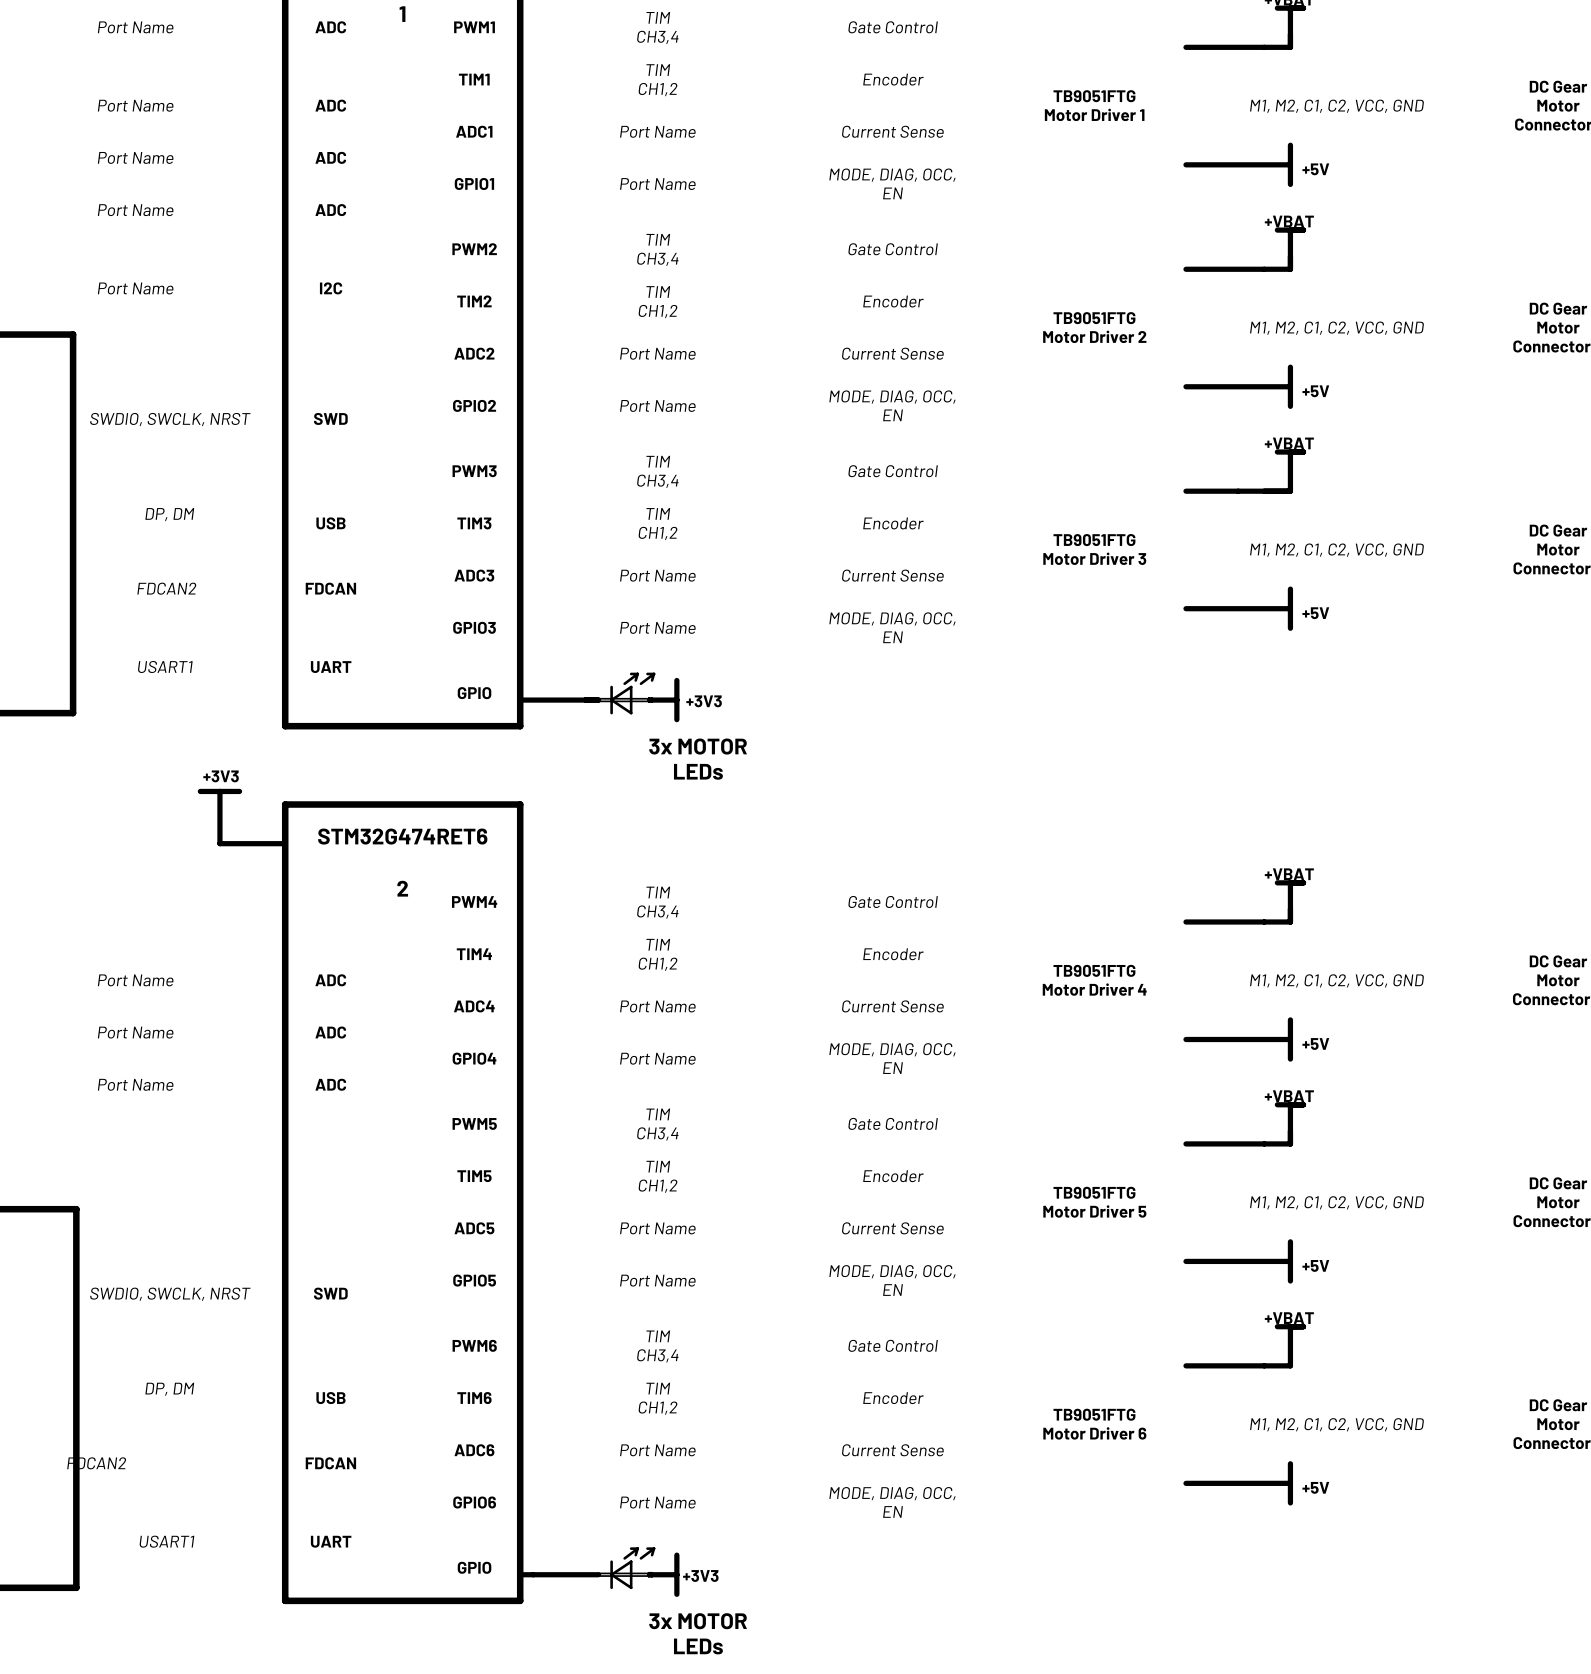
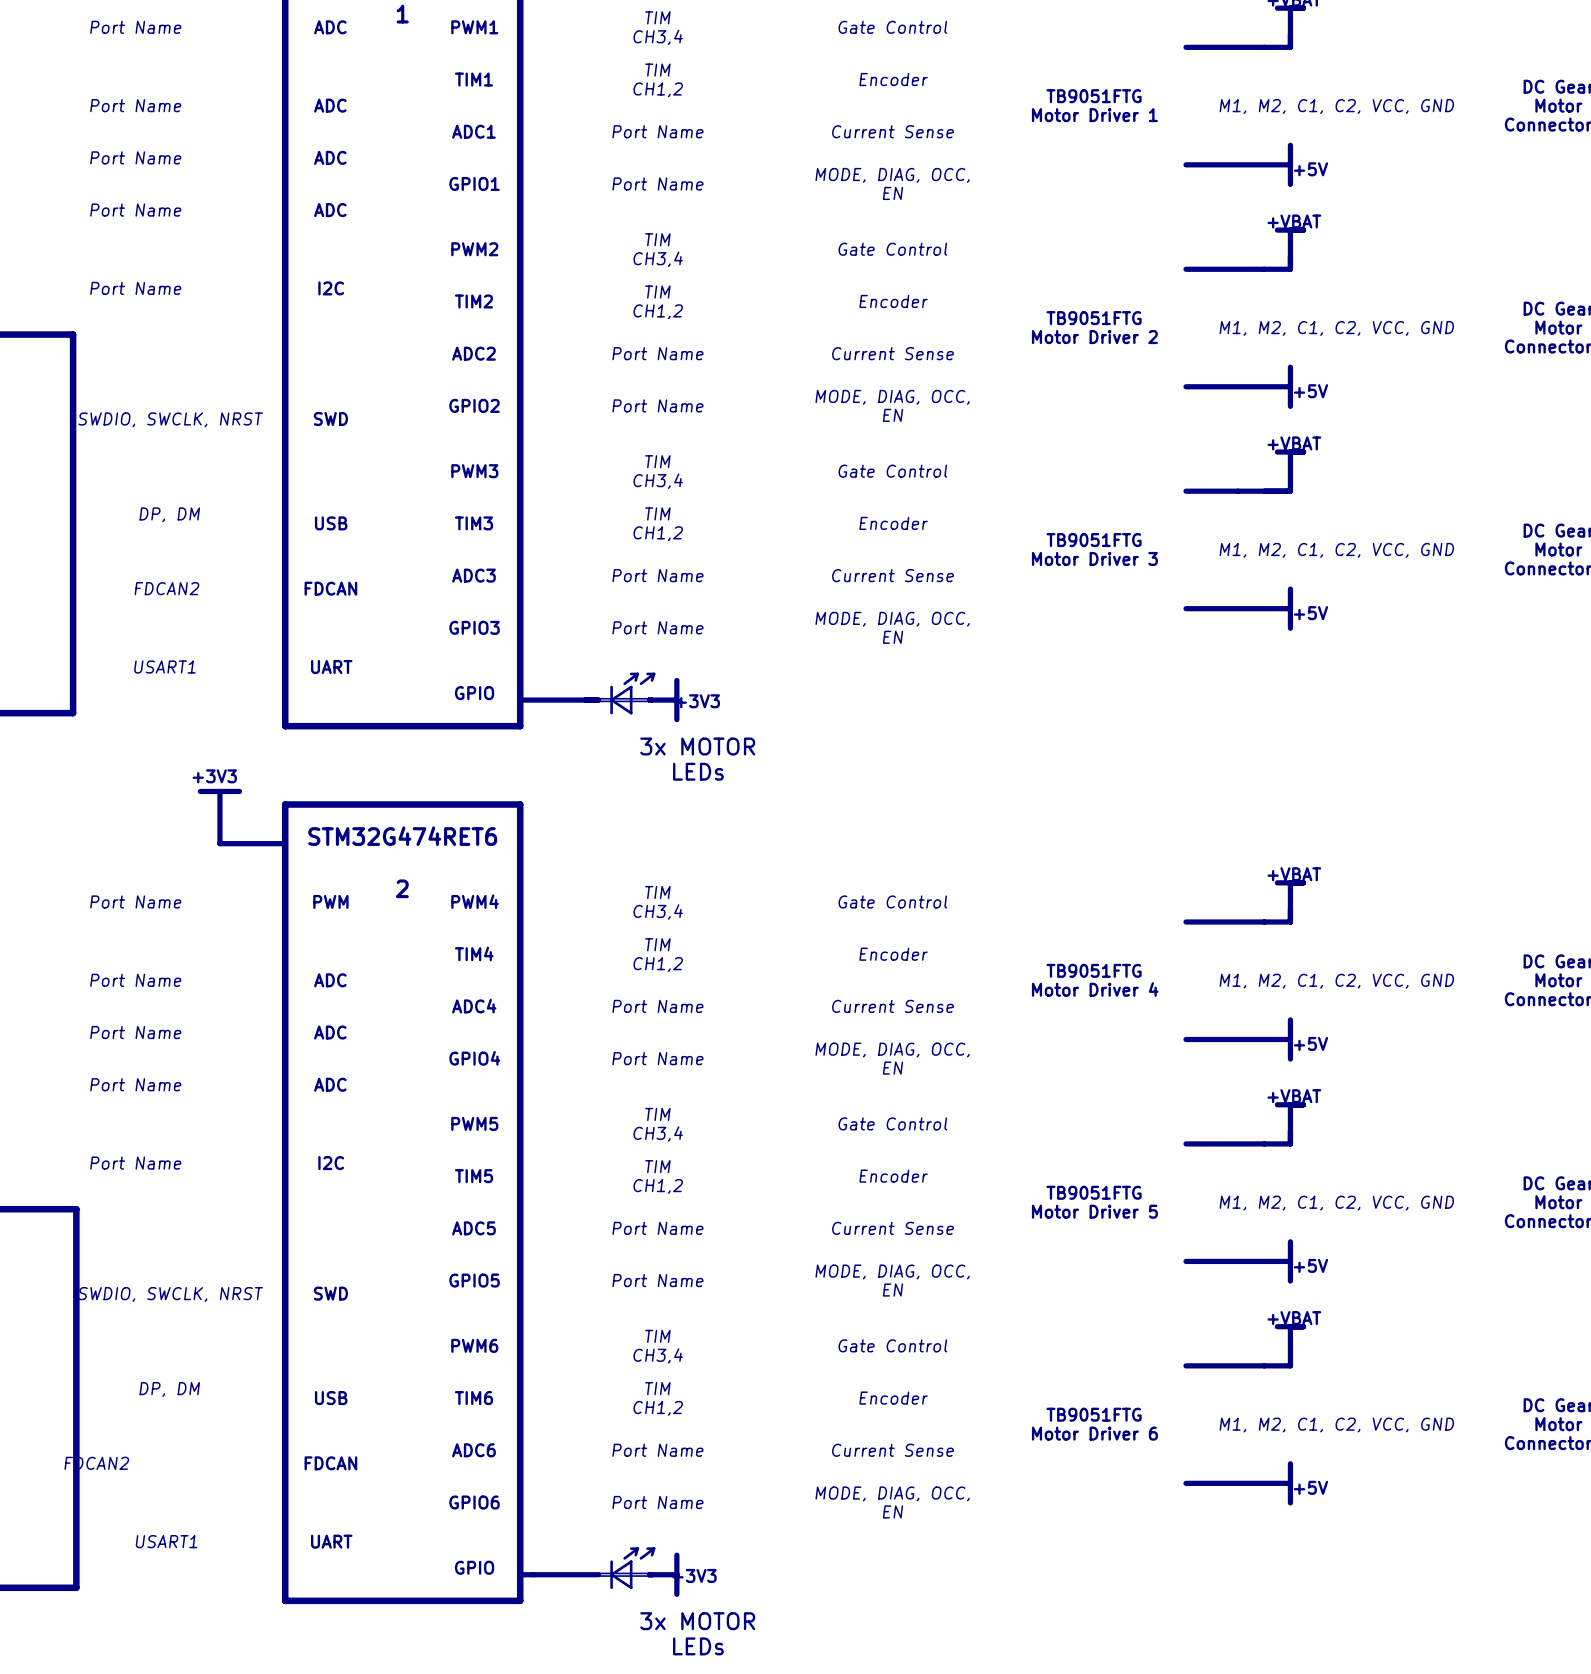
text: none -> PWM (330, 901)
text: none -> Port Name (135, 901)
text: none -> Port Name (135, 1163)
text: none -> I2C (331, 1163)

